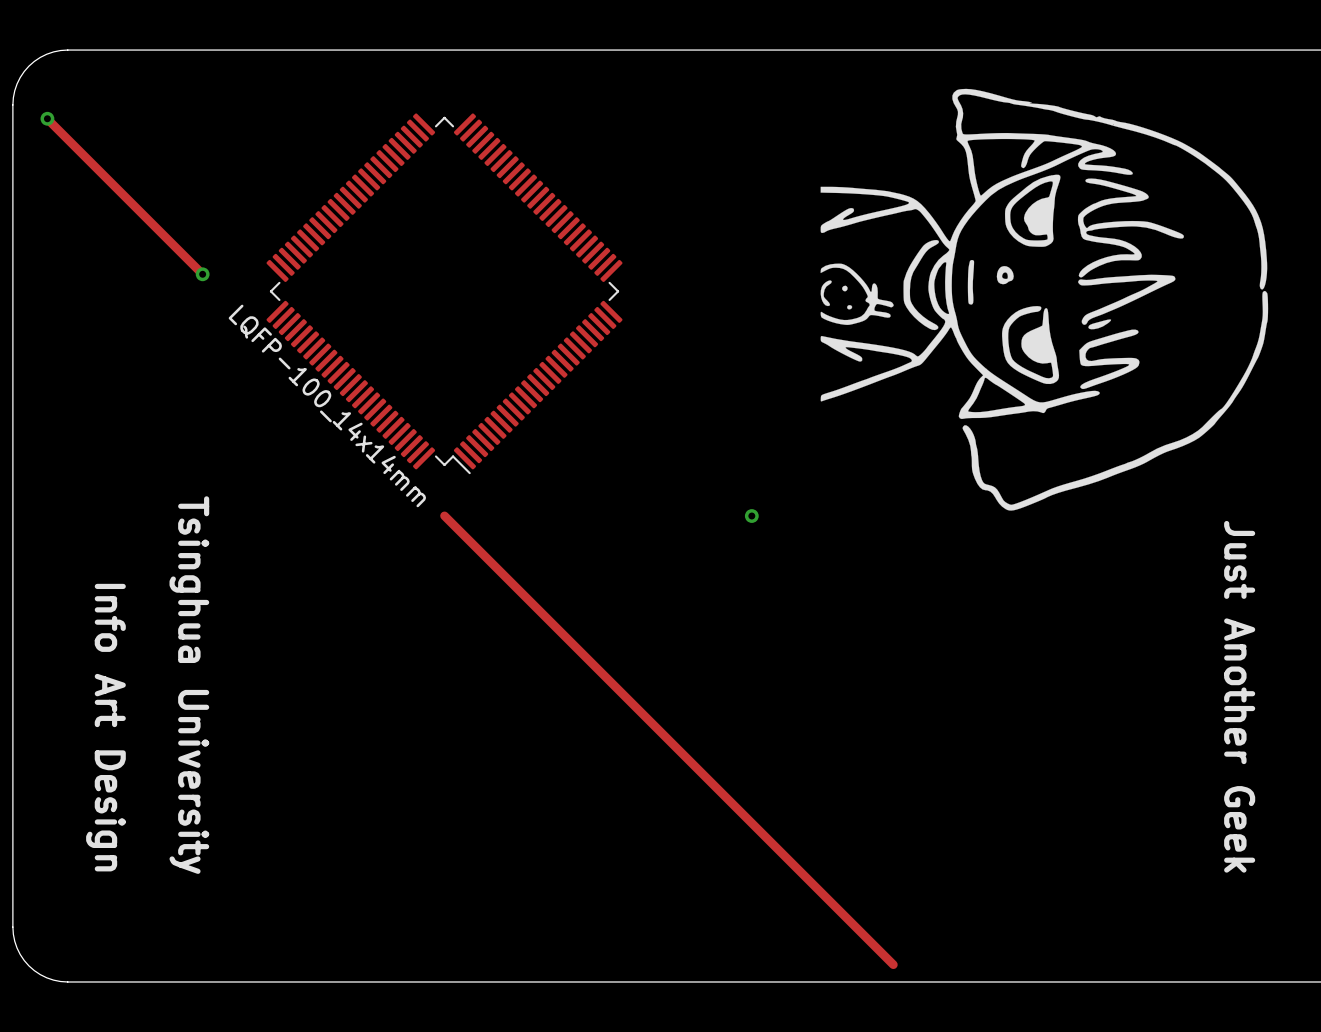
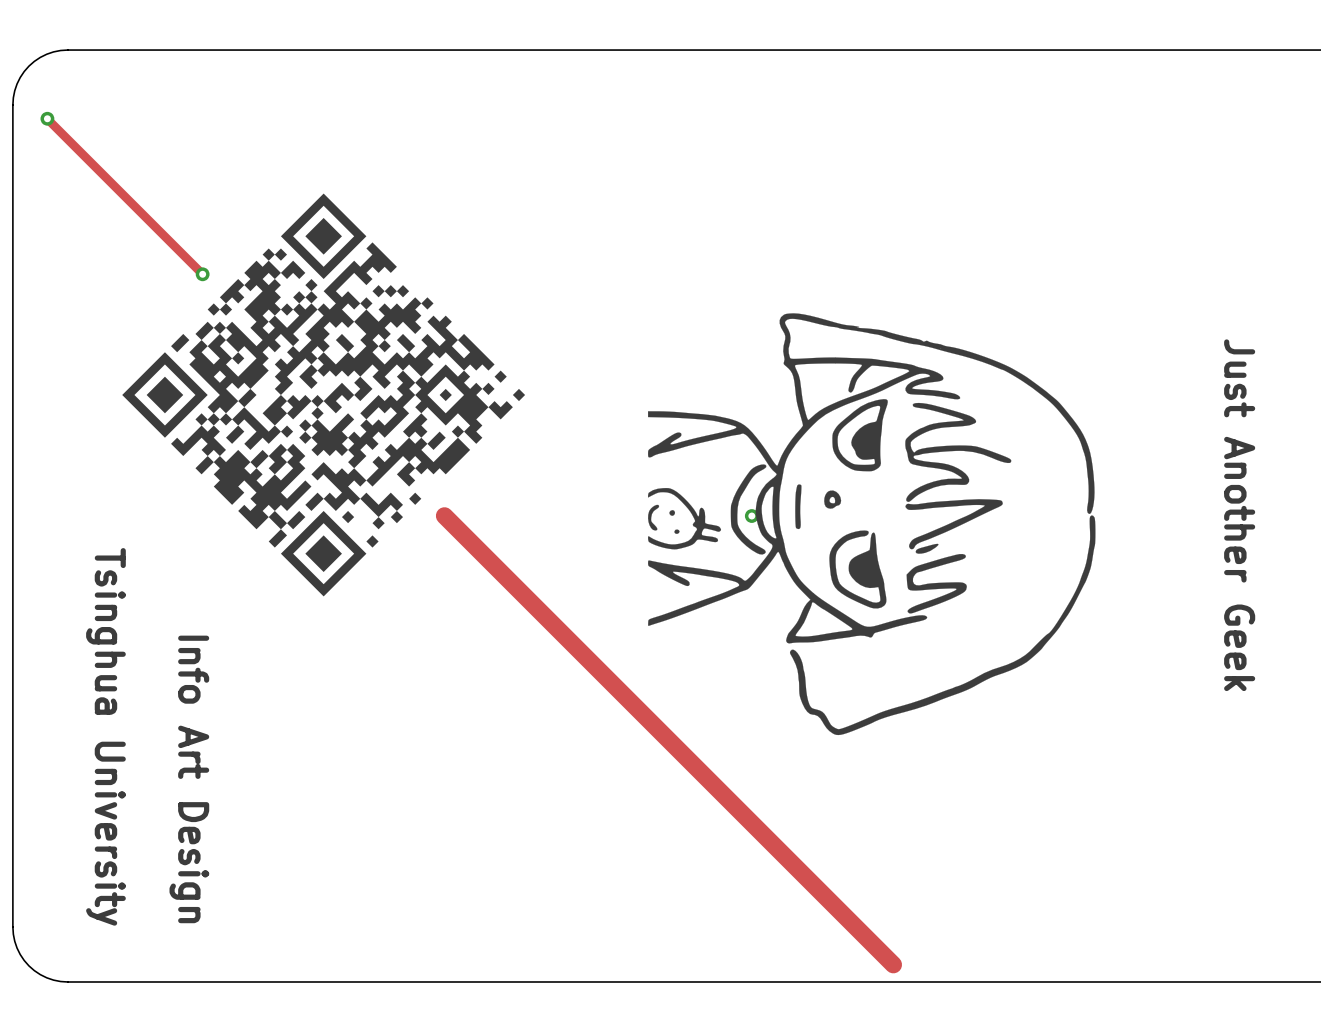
drawing: none -> [122, 193, 526, 597]
LQFP-100_14x14mm: (444, 293) -> none
drawing position: (1044, 299) -> (871, 524)
track width: thin (444, 515) (893, 964) -> thick (444, 515) (893, 964)
text position: Tsinghua University (189, 685) -> Tsinghua University (105, 736)
text position: Just Another Geek (1239, 696) -> Just Another Geek (1239, 515)
text position: Info Art Design (105, 727) -> Info Art Design (189, 779)

